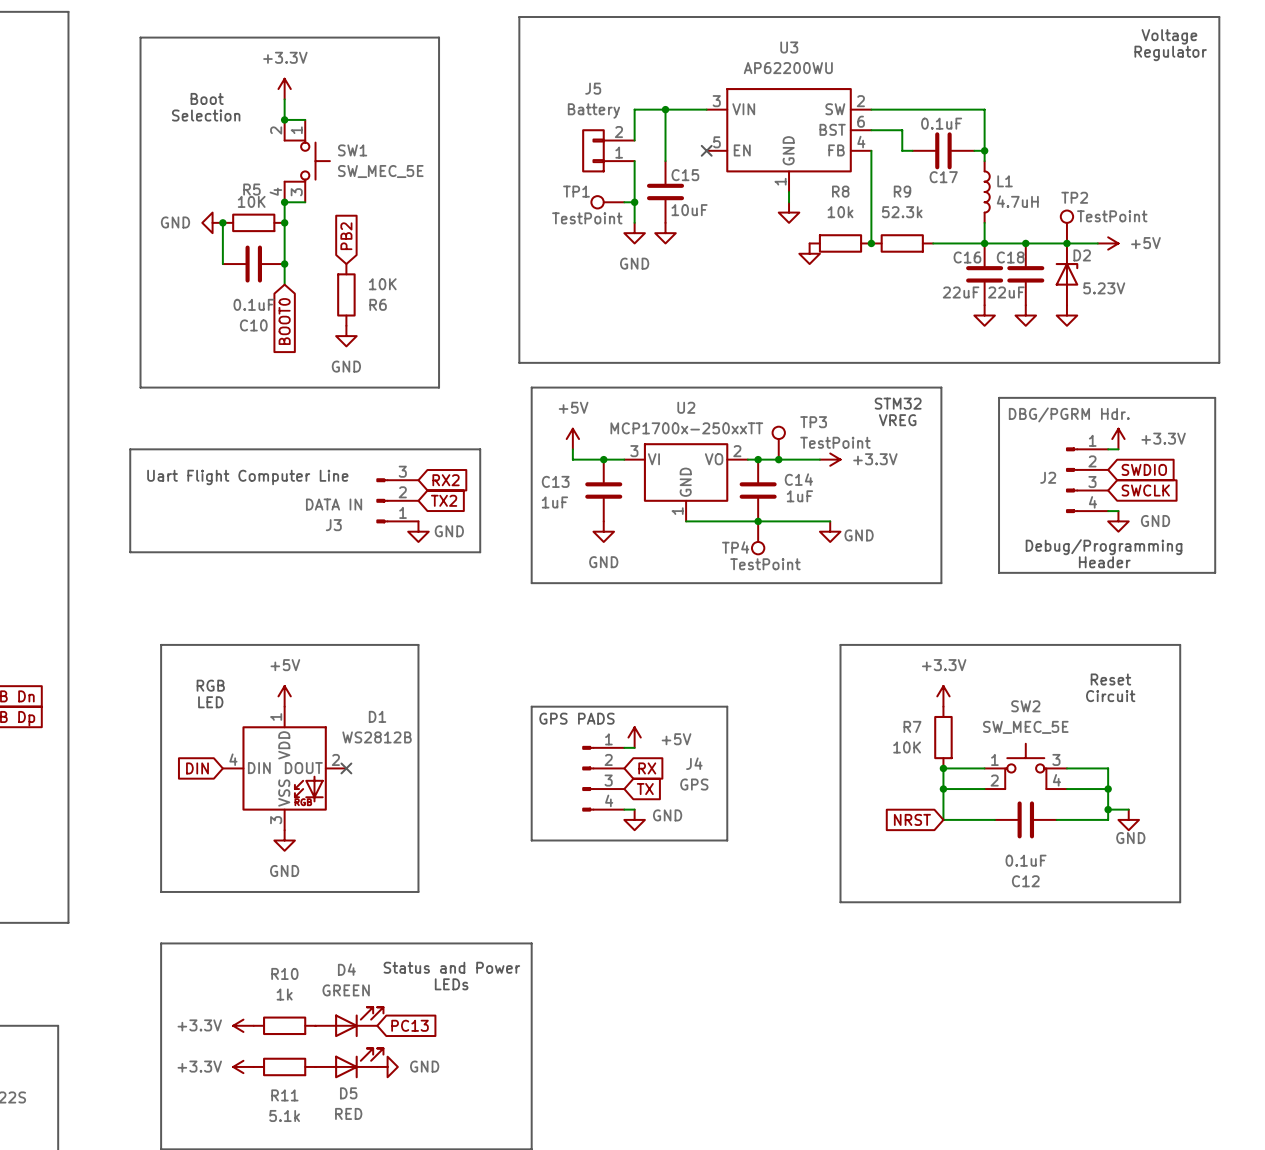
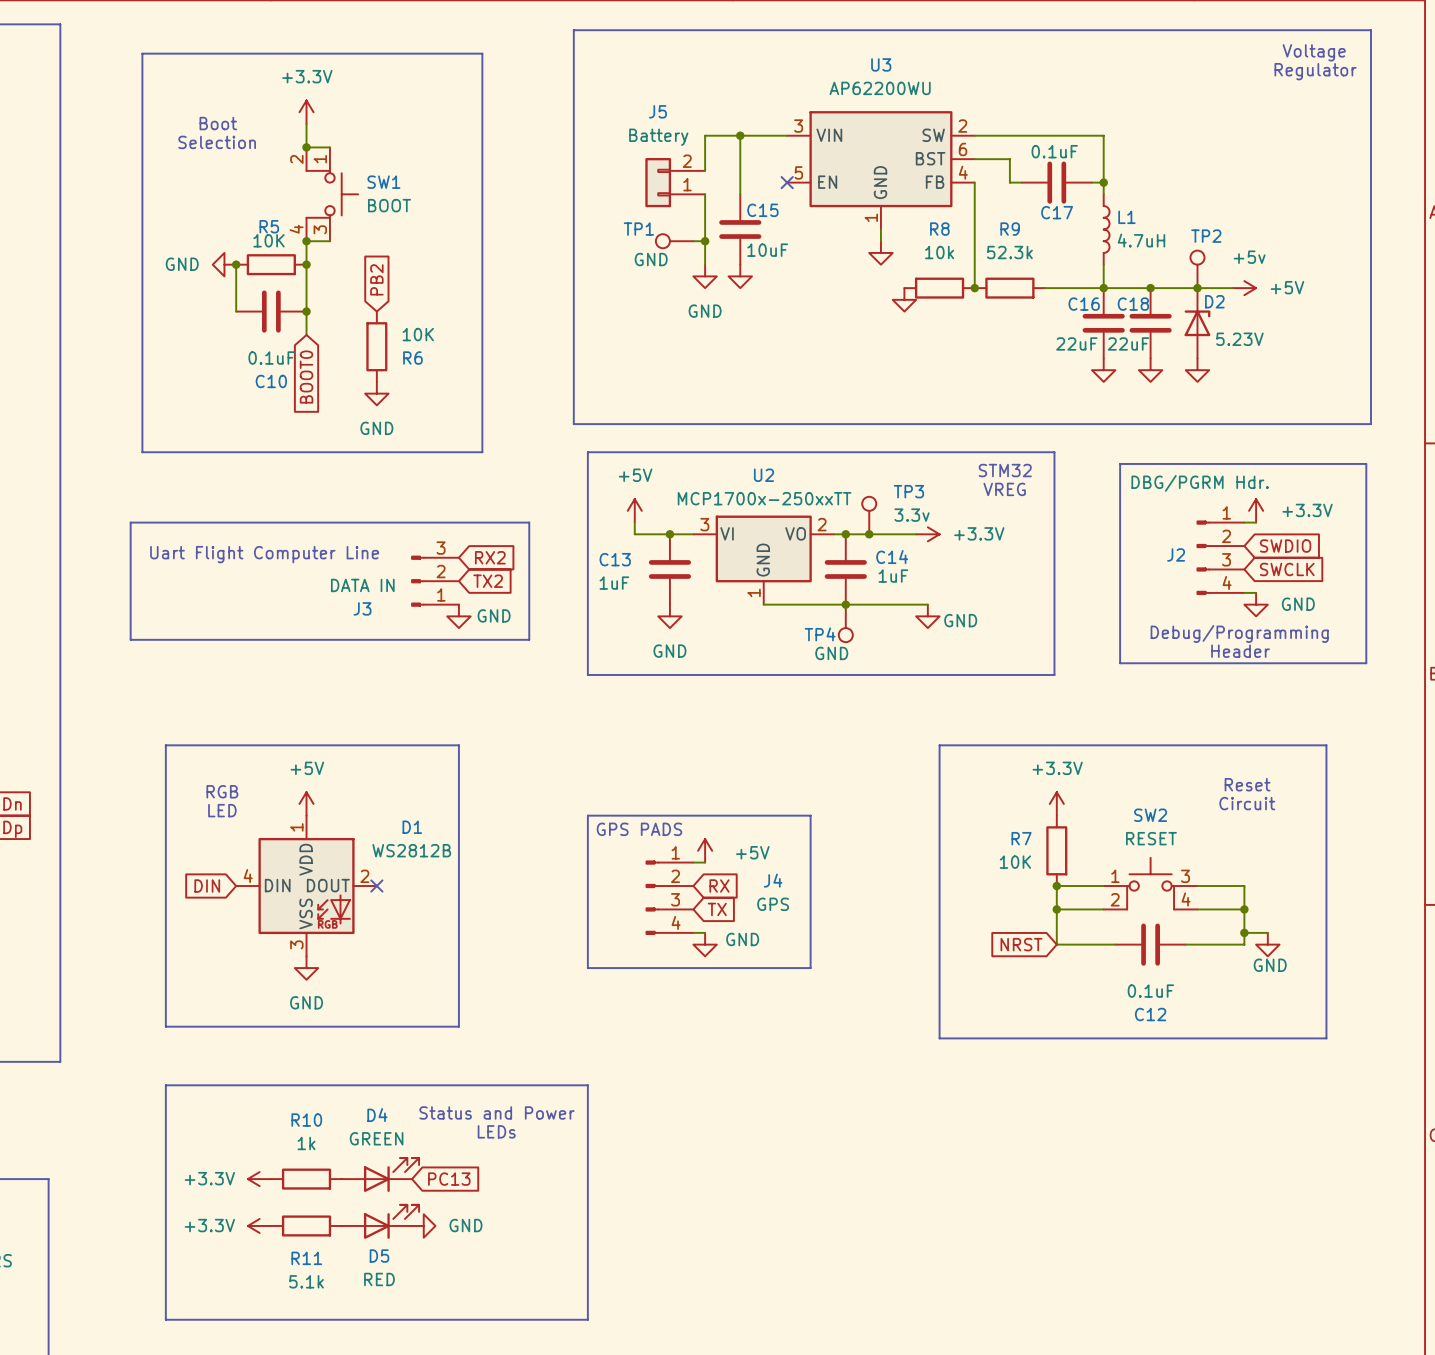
SW1 value: SW_MEC_5E (380, 171) -> BOOT (389, 205)
TP2 value: TestPoint (1112, 216) -> +5v (1249, 257)
TP1 value: TestPoint (587, 218) -> GND (651, 259)
TP3 value: TestPoint (835, 442) -> 3.3v (912, 515)
TP4 value: TestPoint (765, 564) -> GND (831, 653)
SW2 value: SW_MEC_5E (1025, 727) -> RESET (1151, 838)

